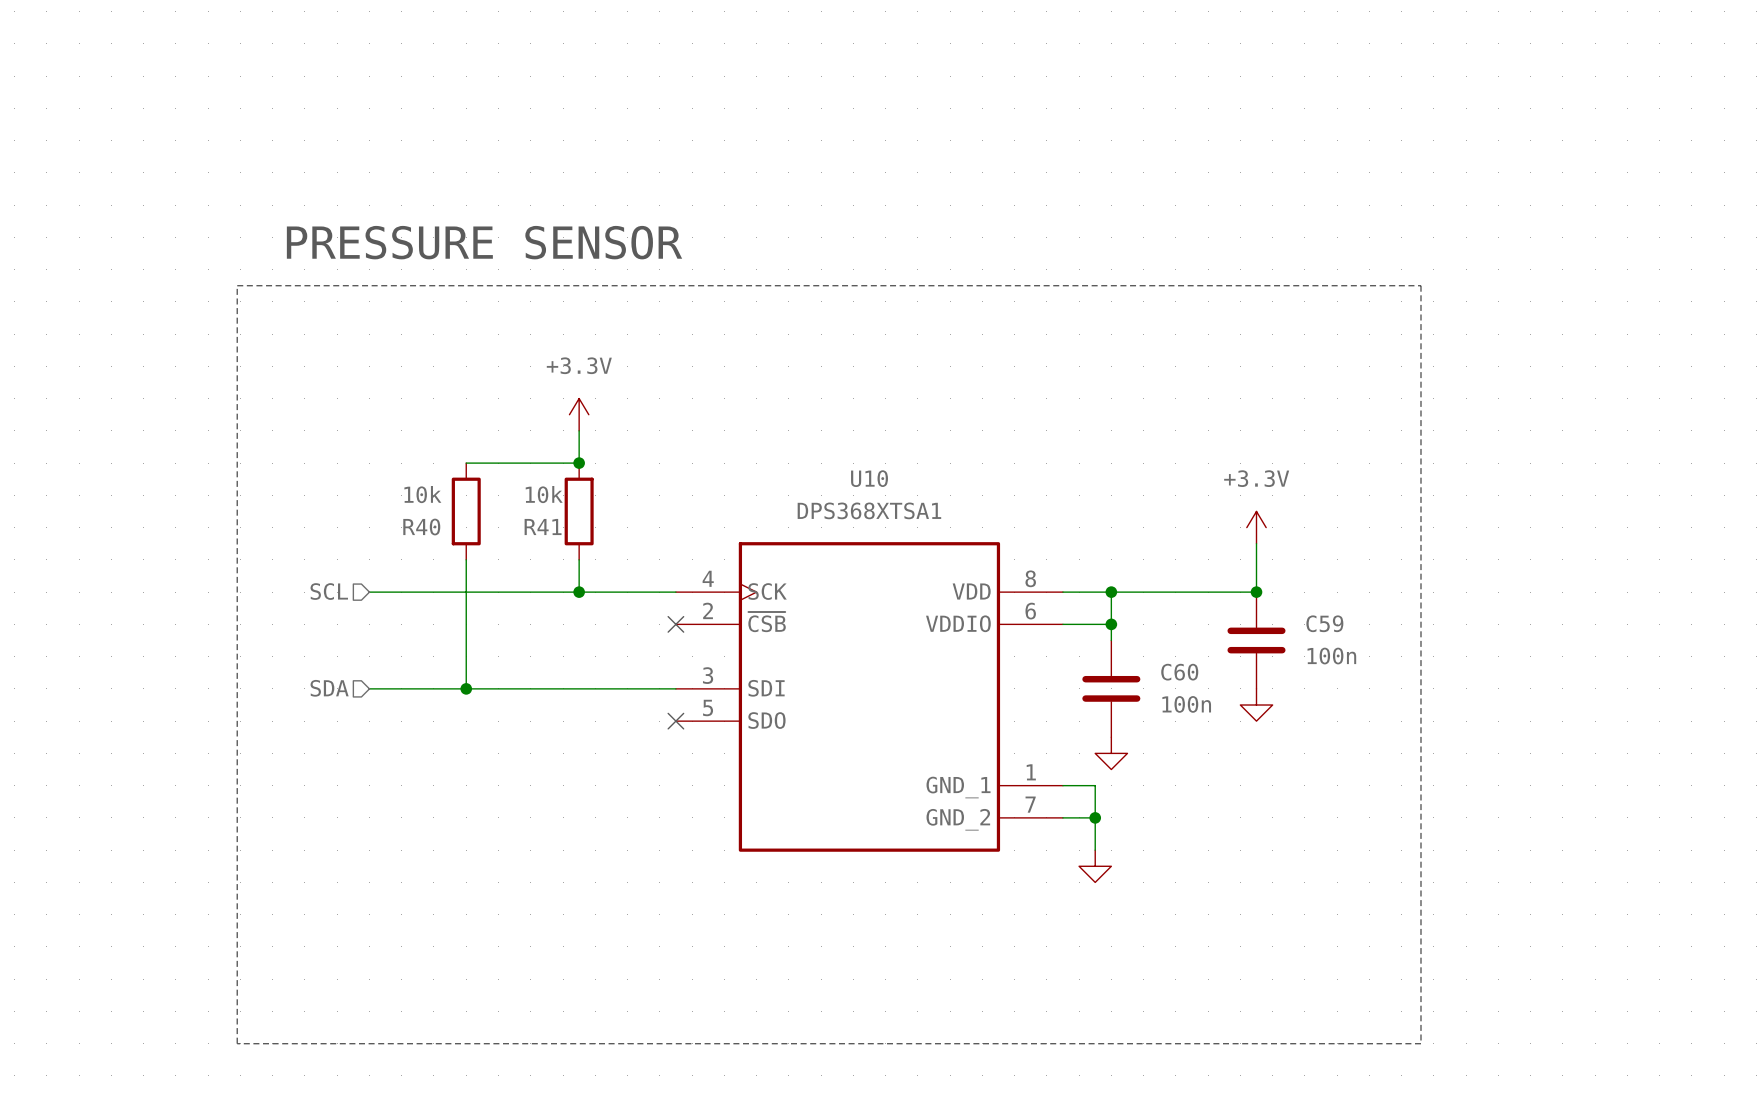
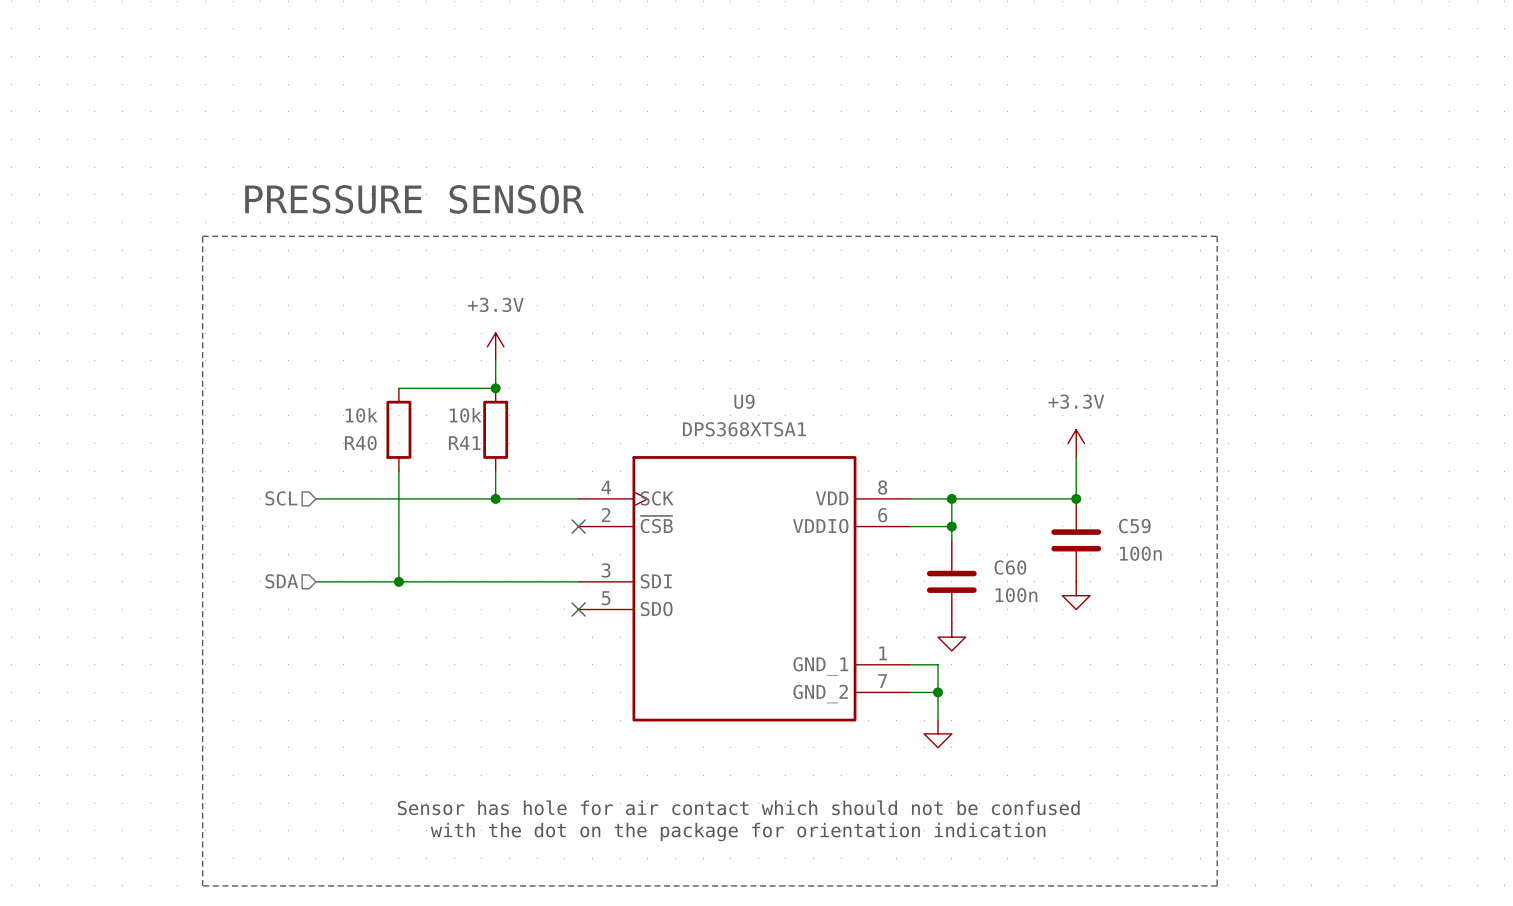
U10 name: U10 (869, 478) -> U9 (744, 401)
text: none -> Sensor has hole for air contact which should not be confused (738, 807)
text: none -> with the dot on the package for orientation indication (738, 832)

